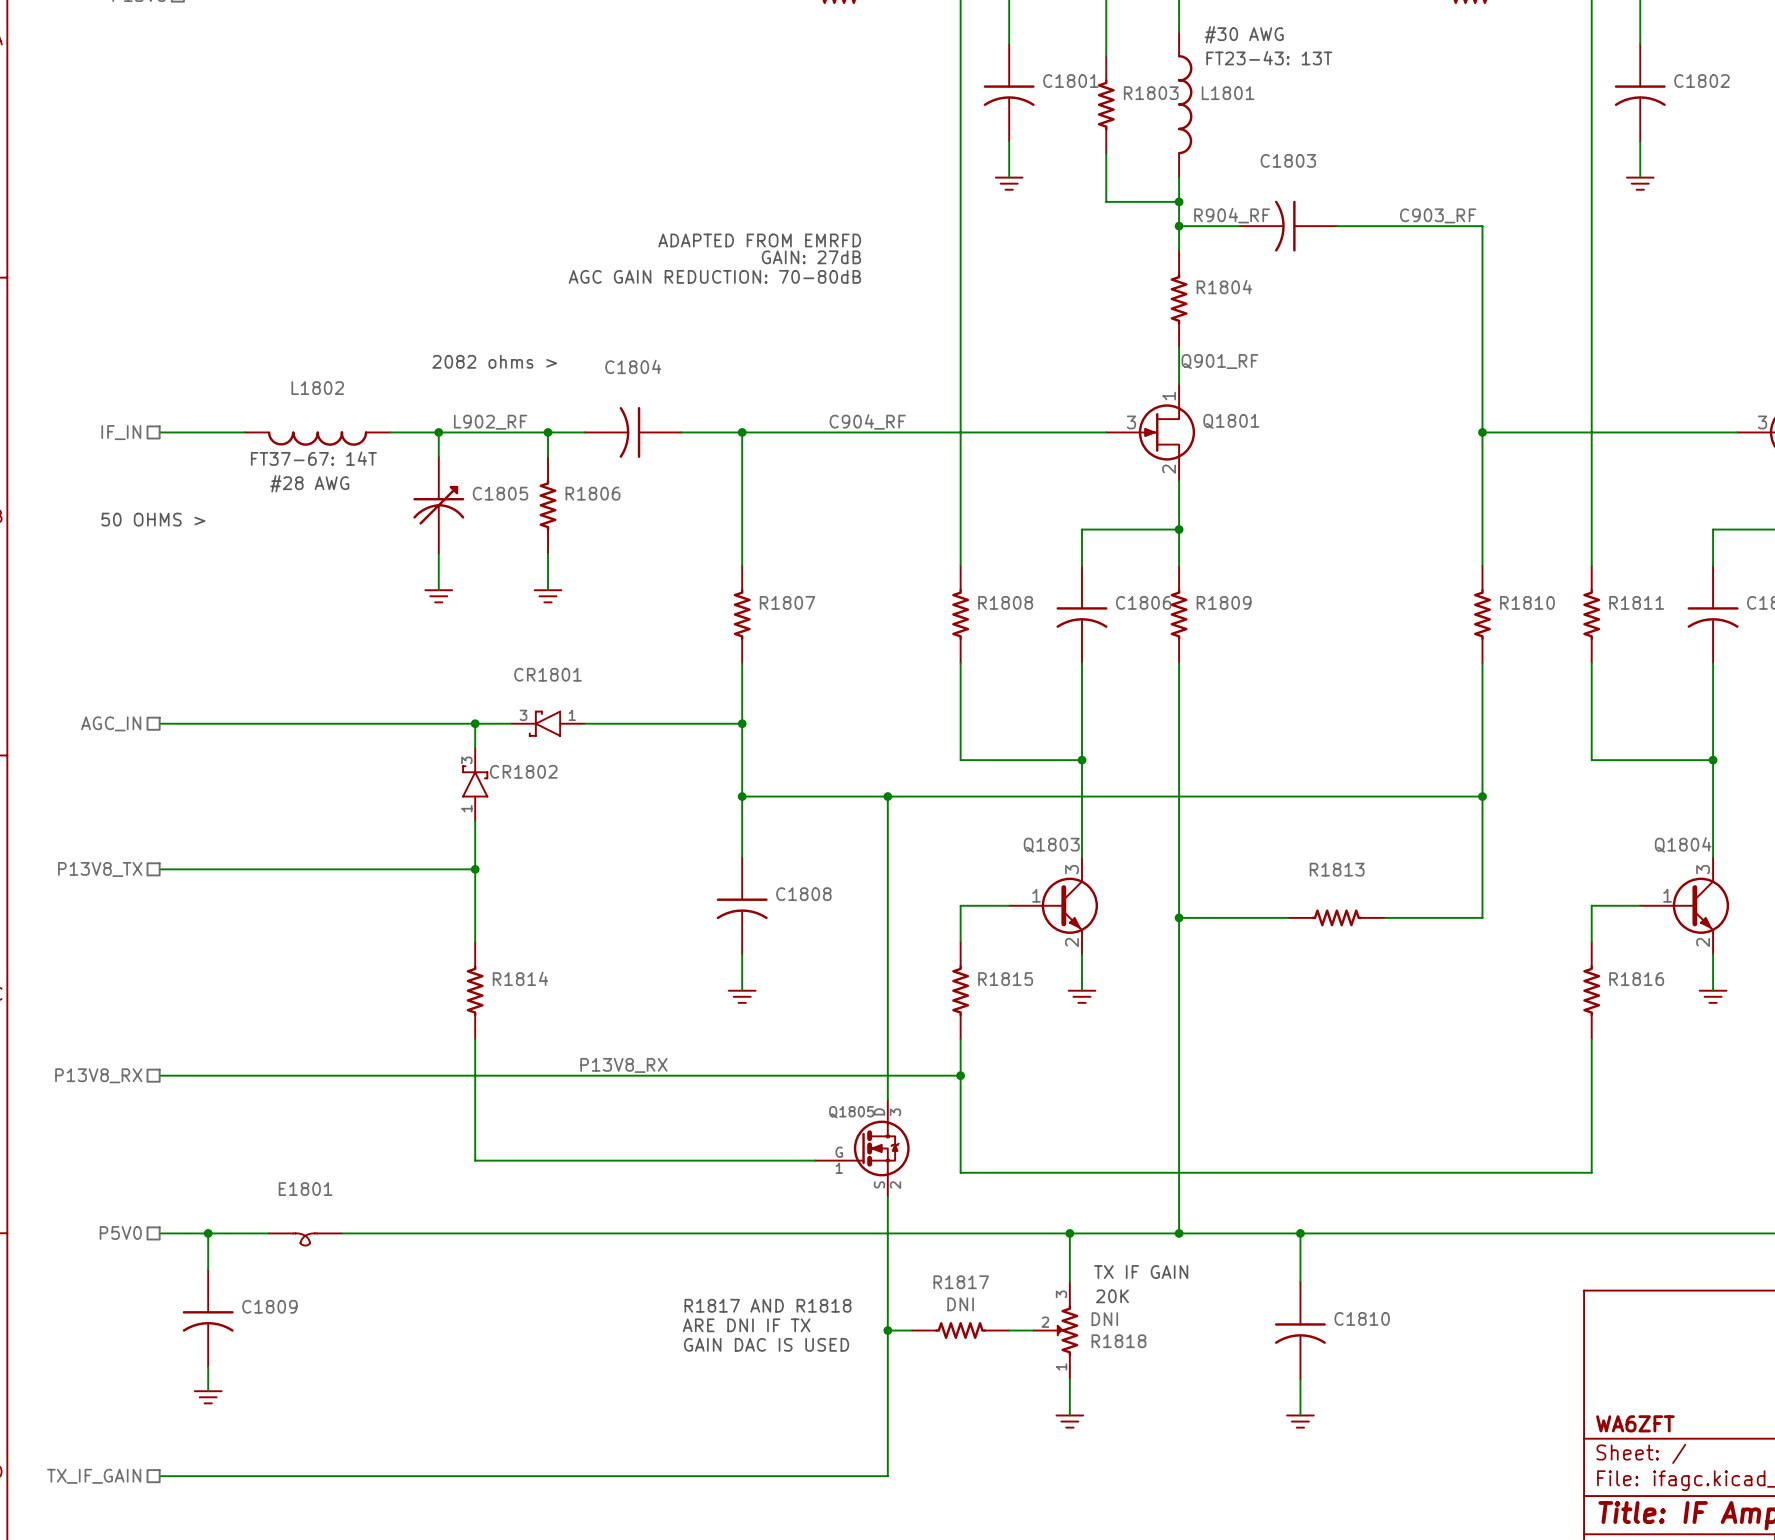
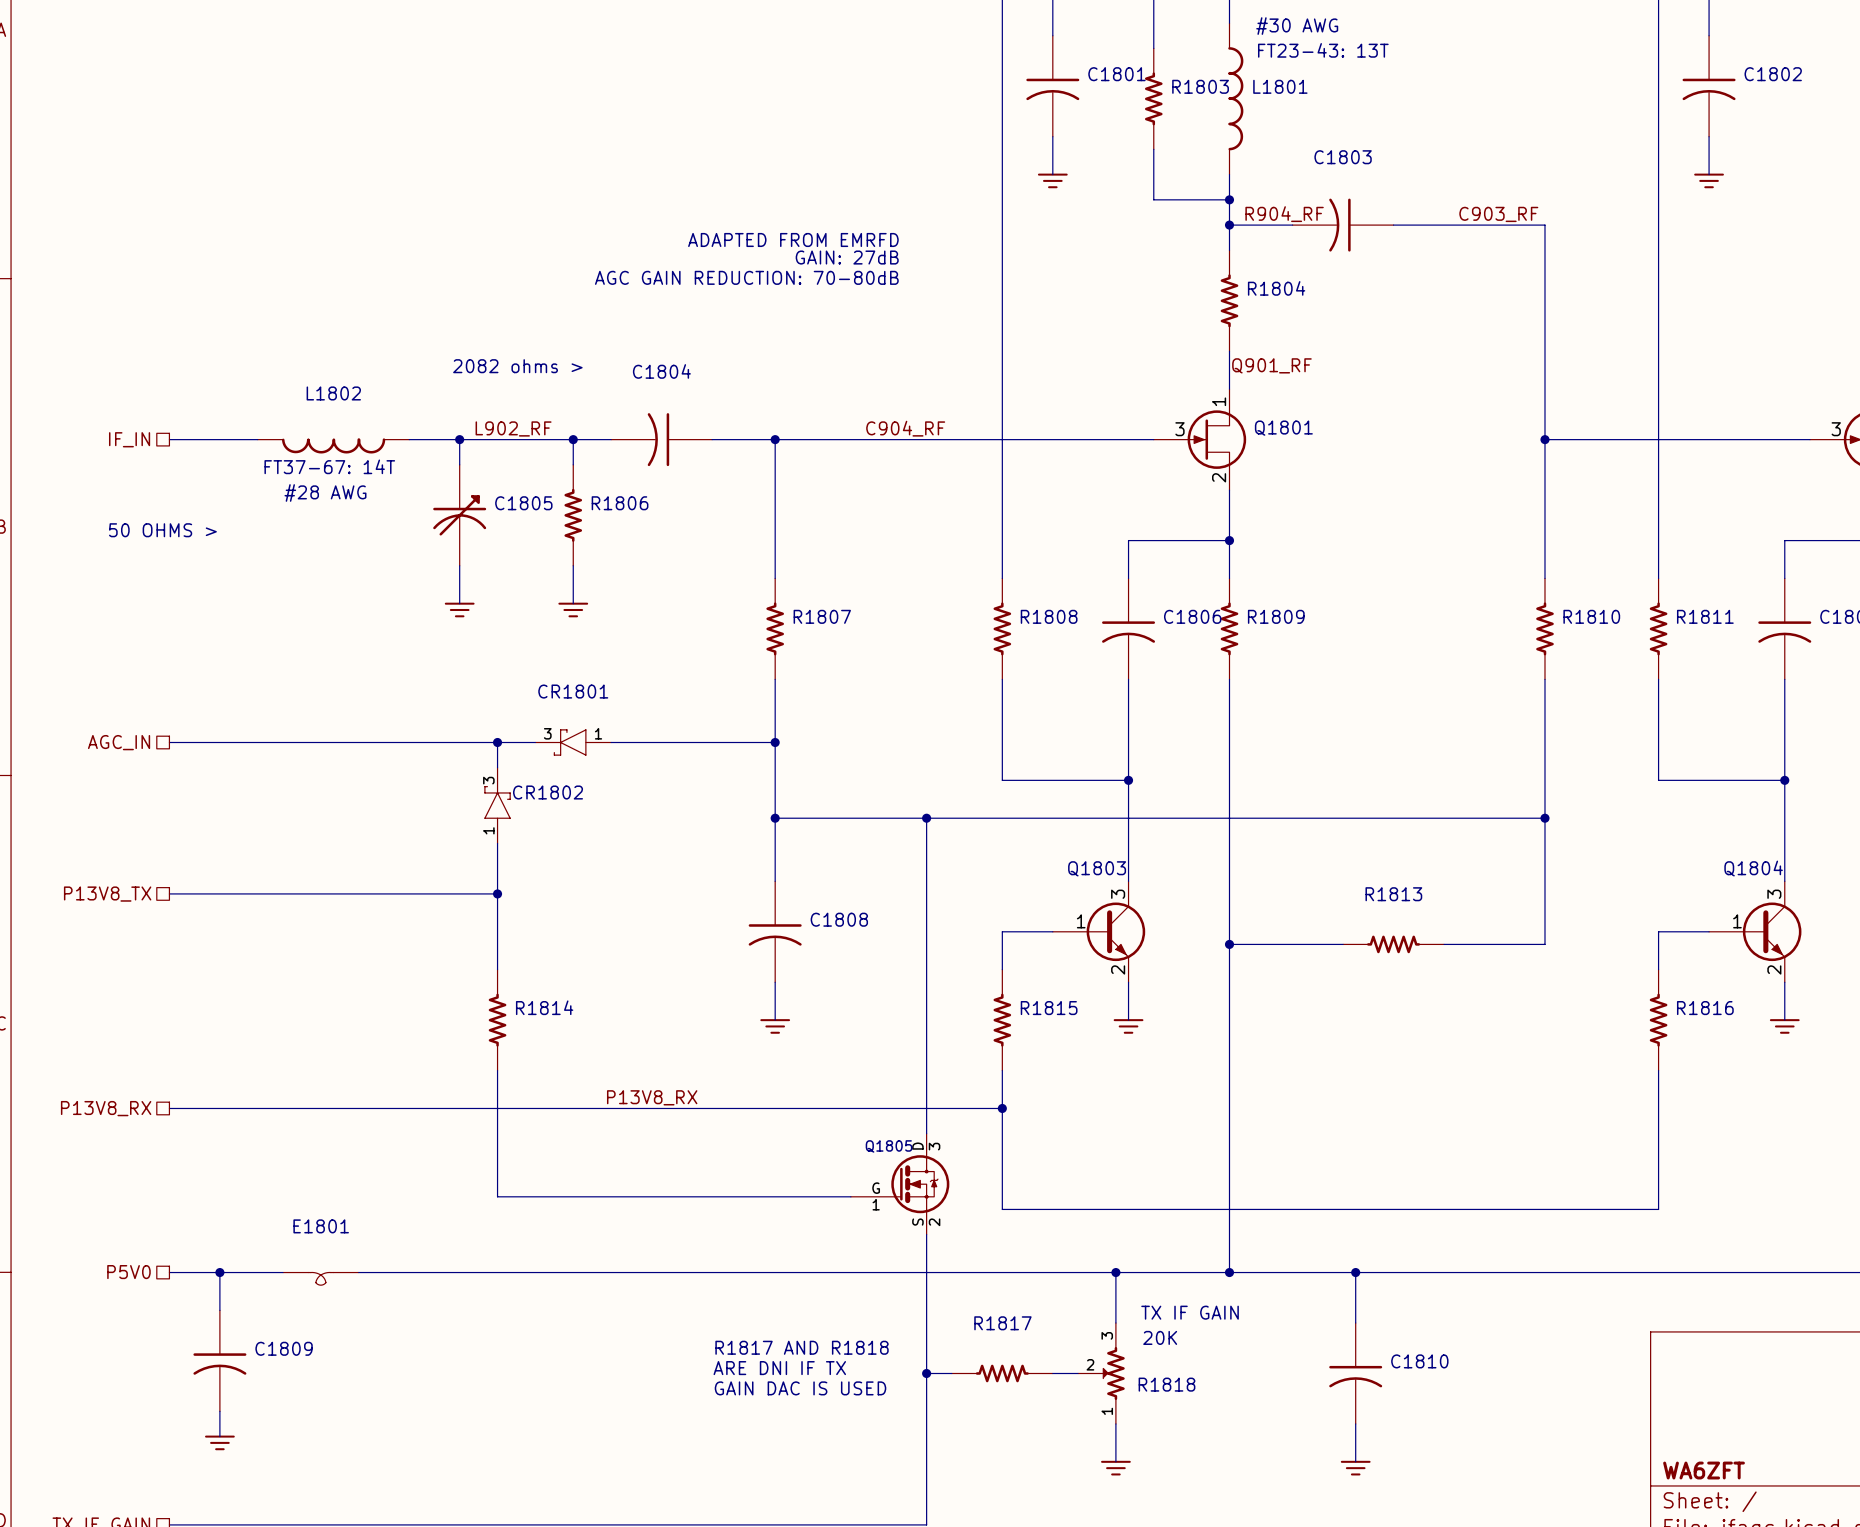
R1817 value: DNI (960, 1304) -> none
R1818 value: DNI (1104, 1319) -> none

